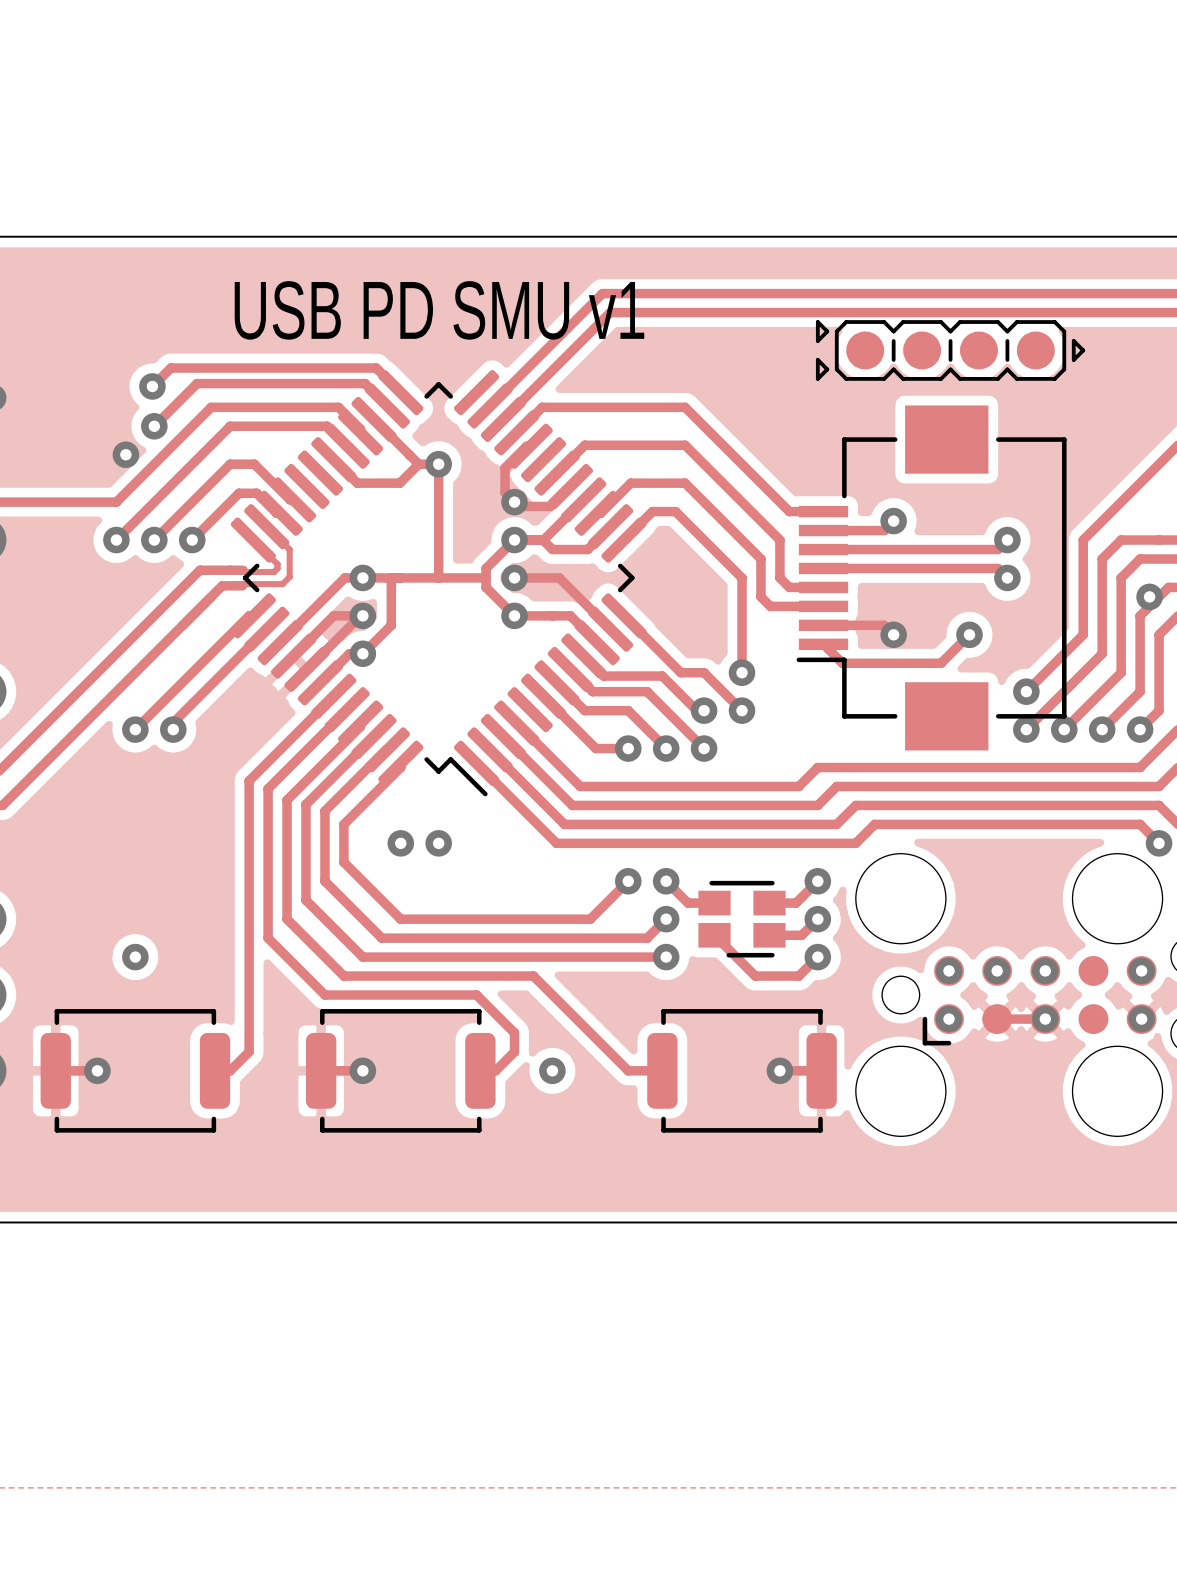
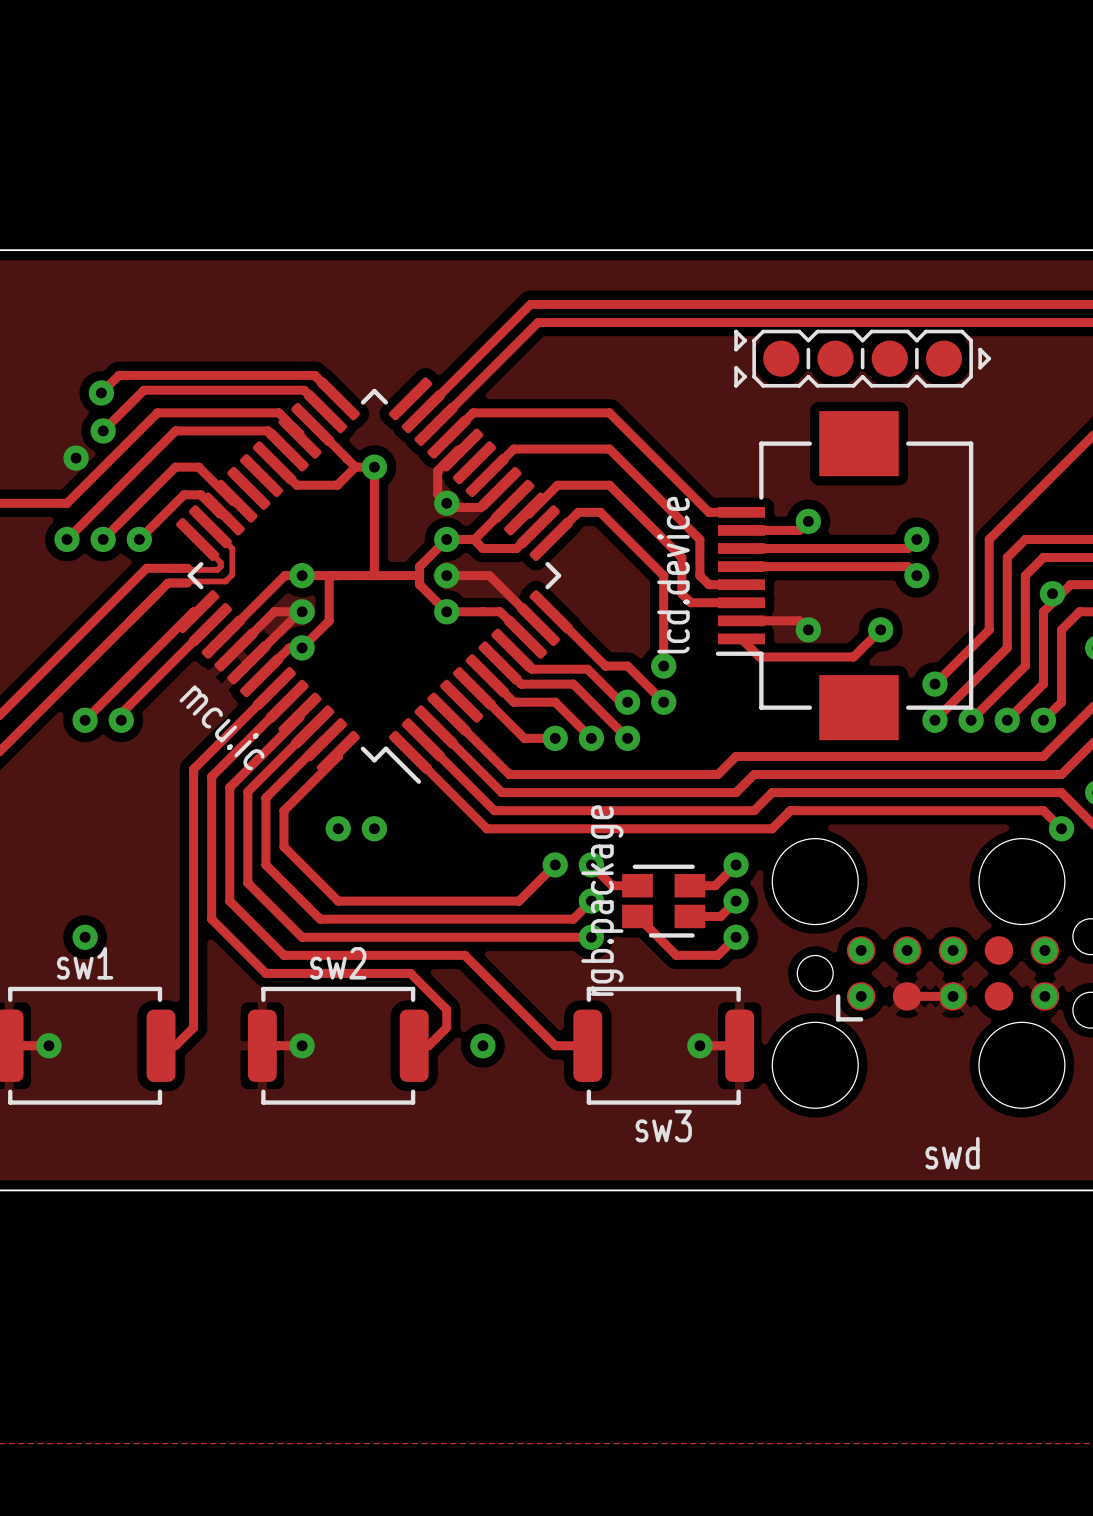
text: USB PD SMU v1 (439, 310) -> none
lcd.device name: none -> lcd.device (673, 575)
mcu.ic name: none -> mcu.ic (222, 727)
rgb.package name: none -> rgb.package (602, 900)
sw1 name: none -> sw1 (85, 963)
sw2 name: none -> sw2 (338, 963)
sw3 name: none -> sw3 (663, 1126)
swd name: none -> swd (952, 1153)

